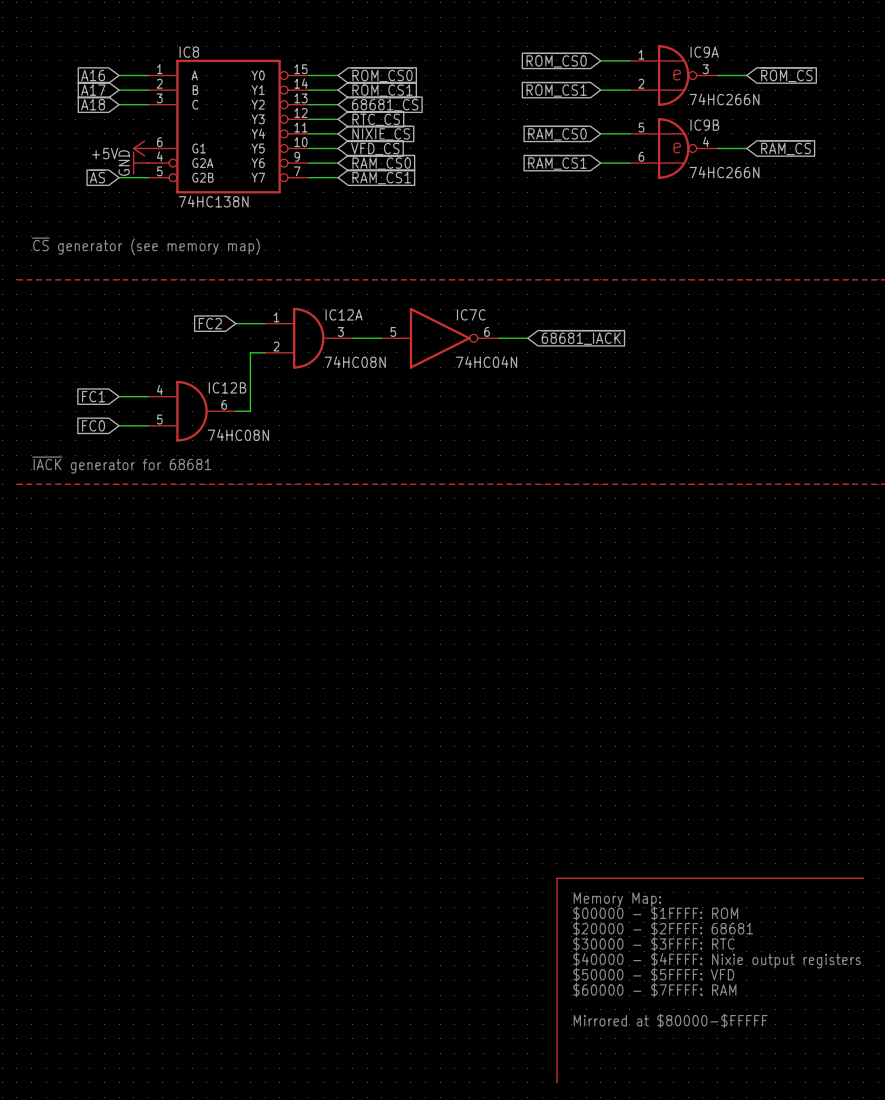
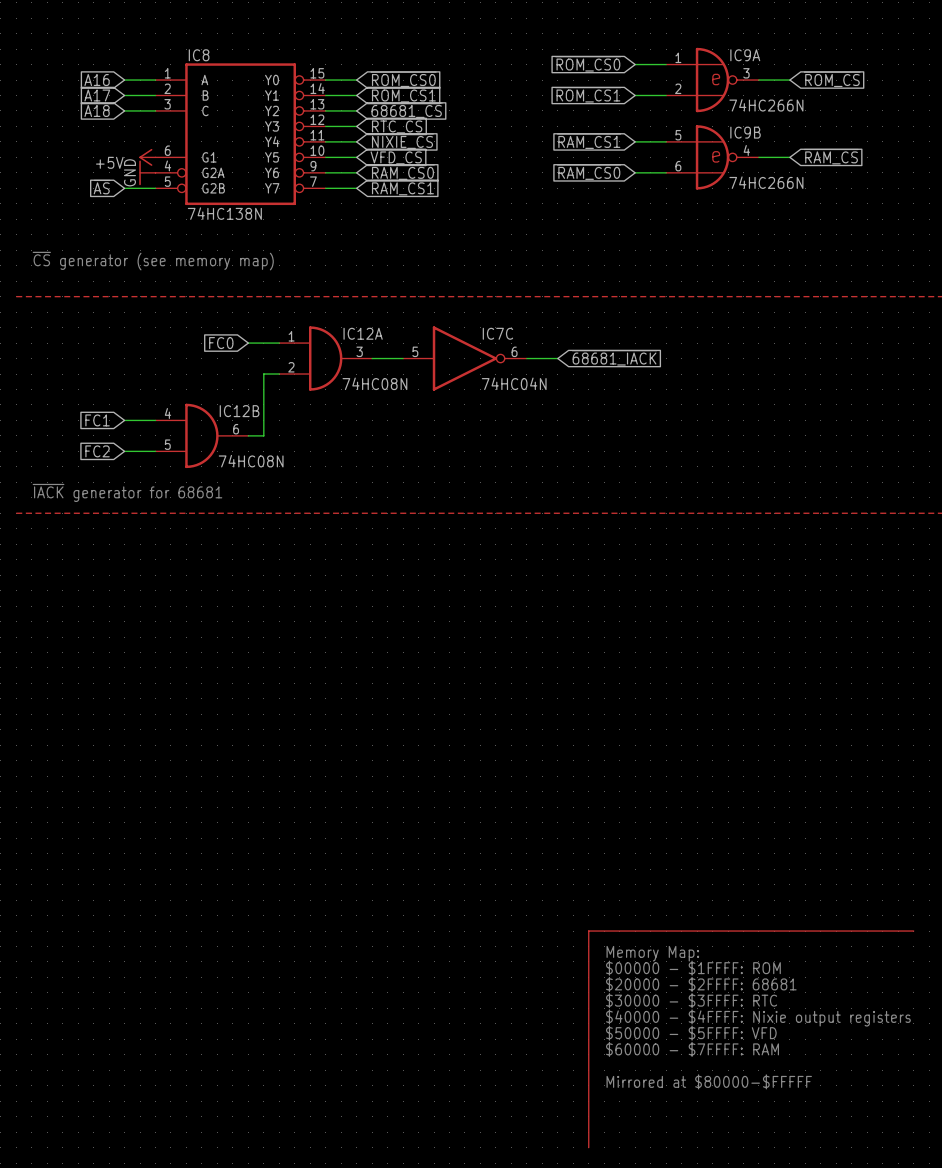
global label: ~{RAM_CS0} (557, 133) -> ~{RAM_CS1} (589, 141)
global label: ~{RAM_CS1} (557, 162) -> ~{RAM_CS0} (589, 172)
global label: FC2 (210, 323) -> FC0 (221, 343)
global label: FC0 (93, 425) -> FC2 (97, 451)

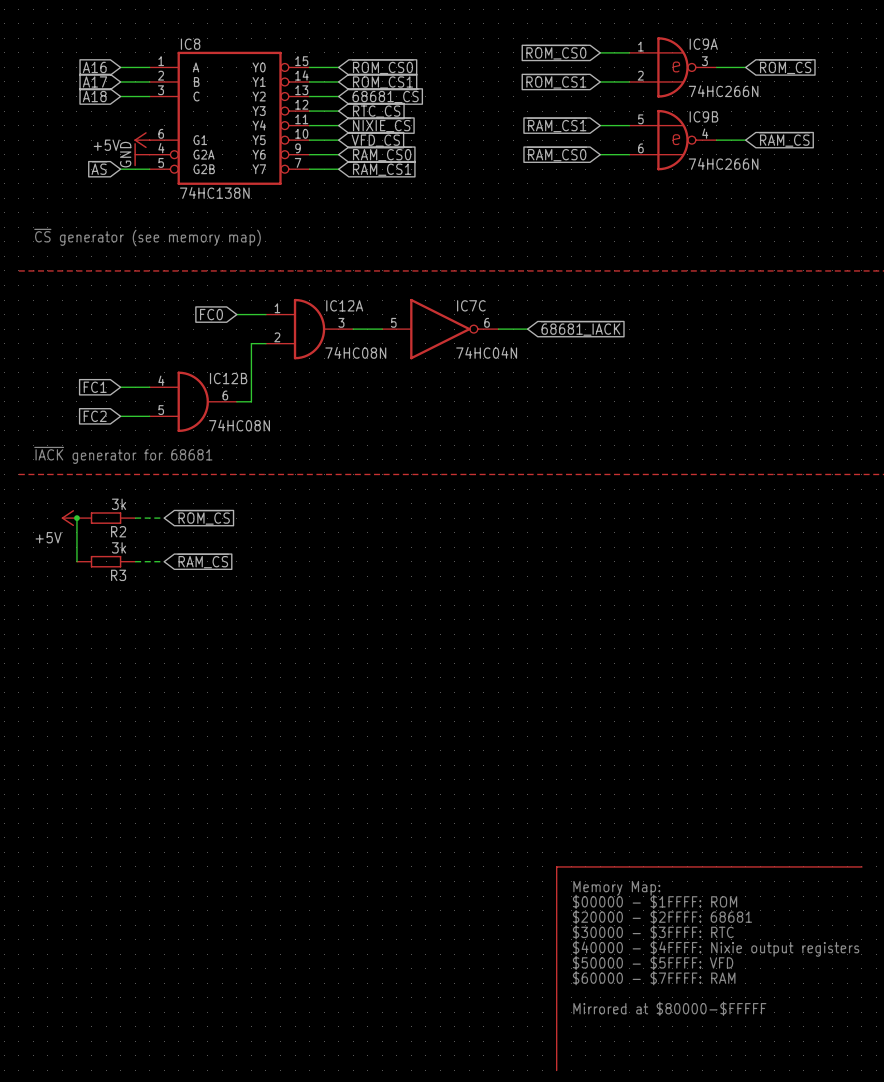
global label: none -> ~{ROM_CS} (203, 517)
power symbol: none -> +5V (69, 518)
wire: none -> (76, 518) (76, 561)
junction: none -> (76, 518)
R2: none -> 3k (106, 518)
wire: none -> (135, 518) (164, 518)
global label: none -> ~{RAM_CS} (203, 561)
R3: none -> 3k (106, 561)
wire: none -> (135, 561) (164, 561)

